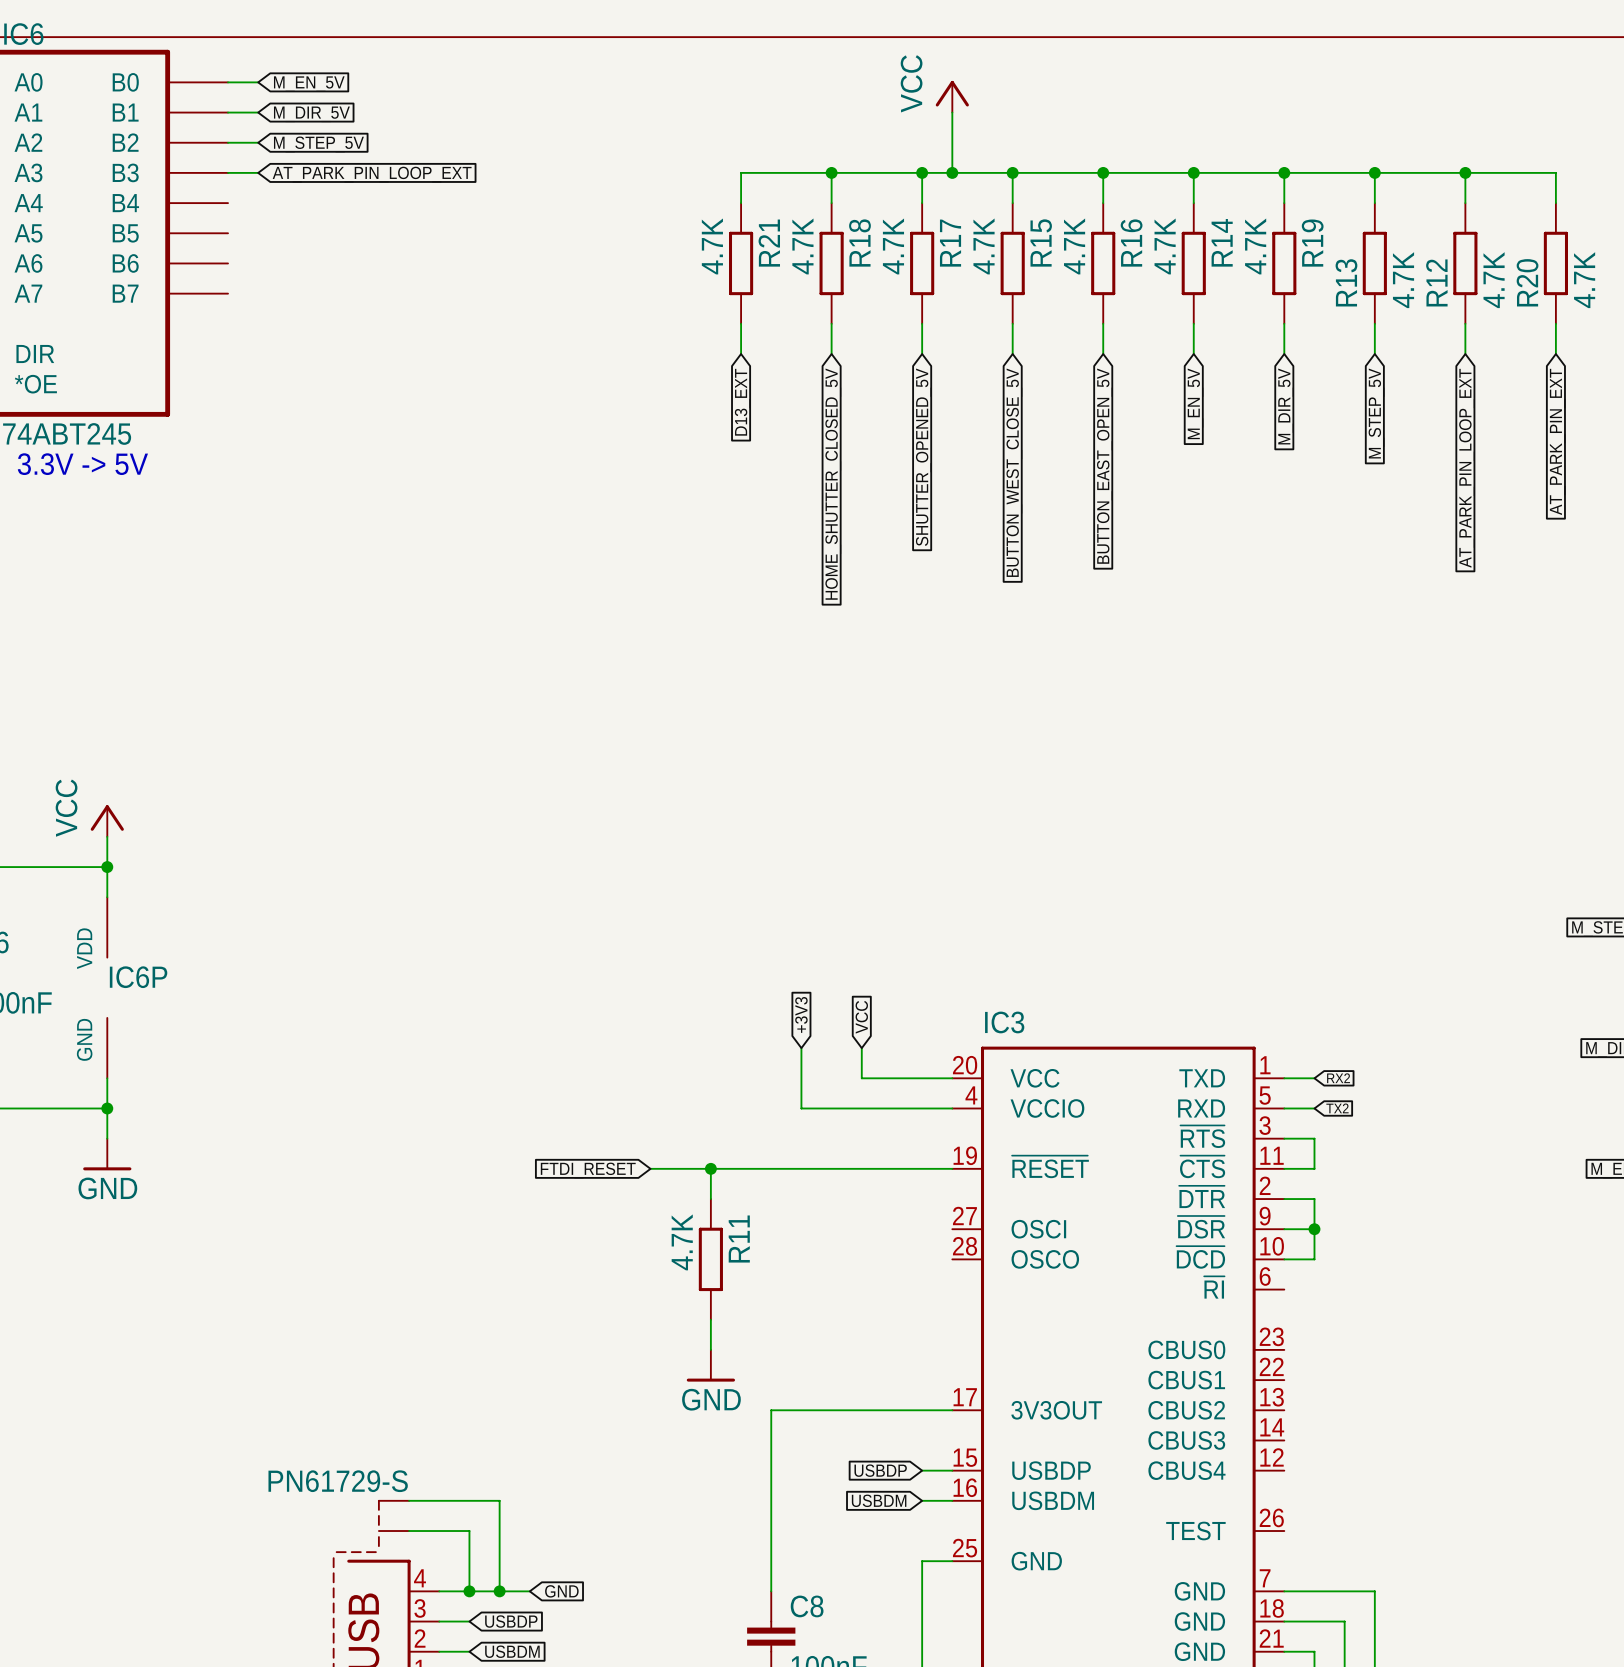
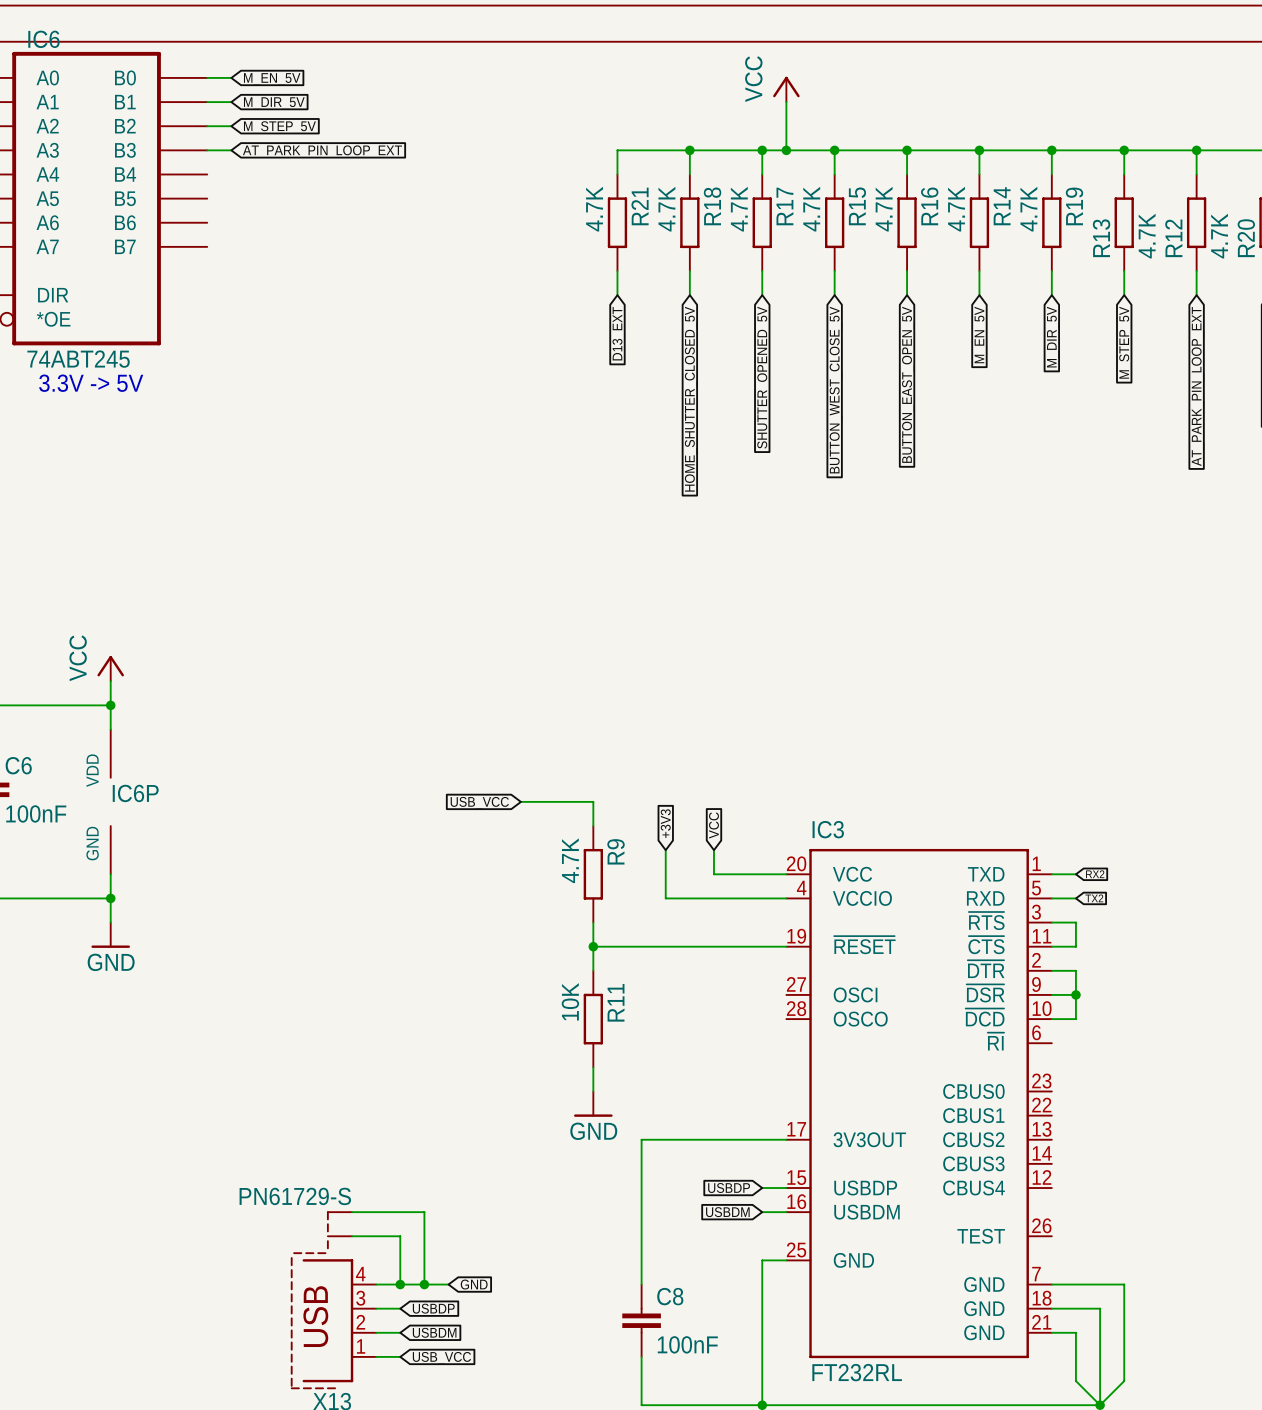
wire: none -> (520, 801) (593, 801) (593, 826)
global label: none -> USB_VCC (479, 803)
R9: none -> 4.7K (593, 874)
wire: (650, 1168) (710, 1168) -> (593, 922) (593, 946)
global label: FTDI_RESET (588, 1170) -> none
R11 value: 4.7K (682, 1242) -> 10K (570, 1001)

